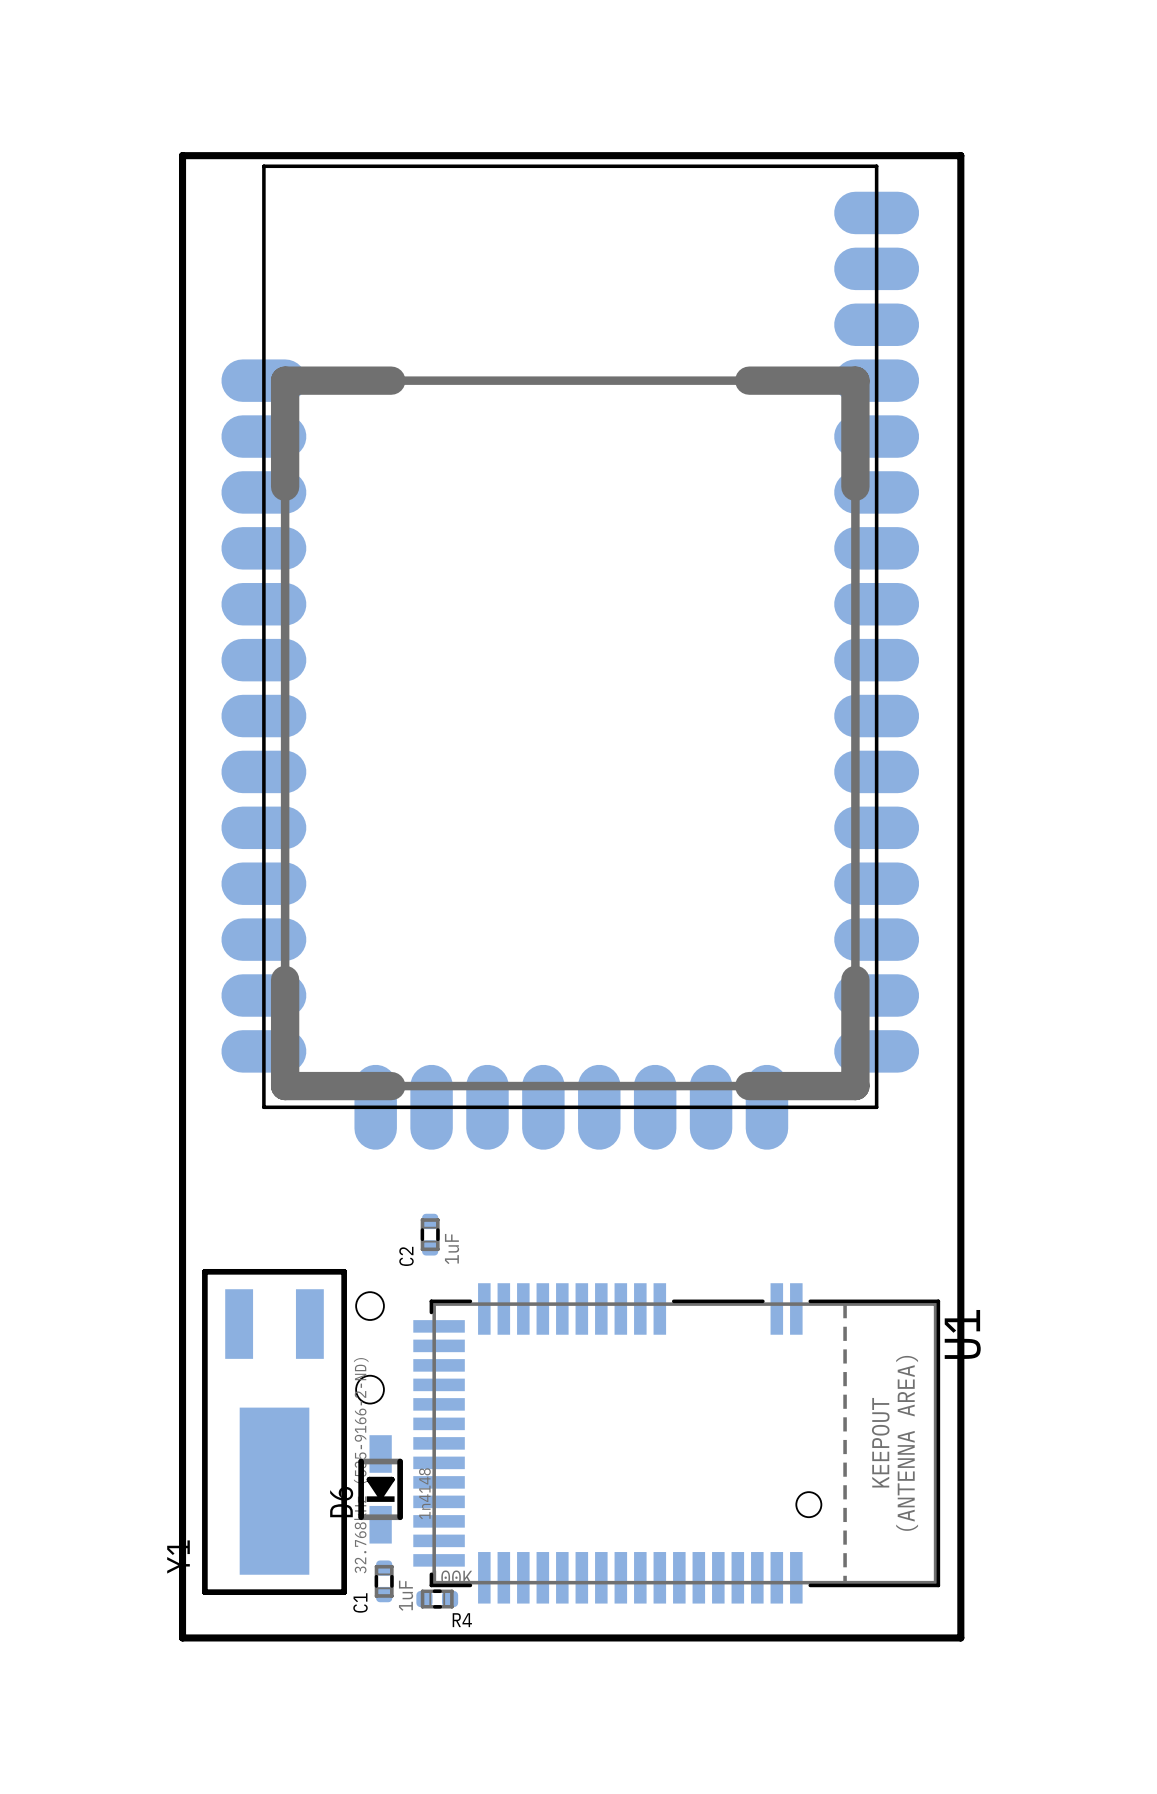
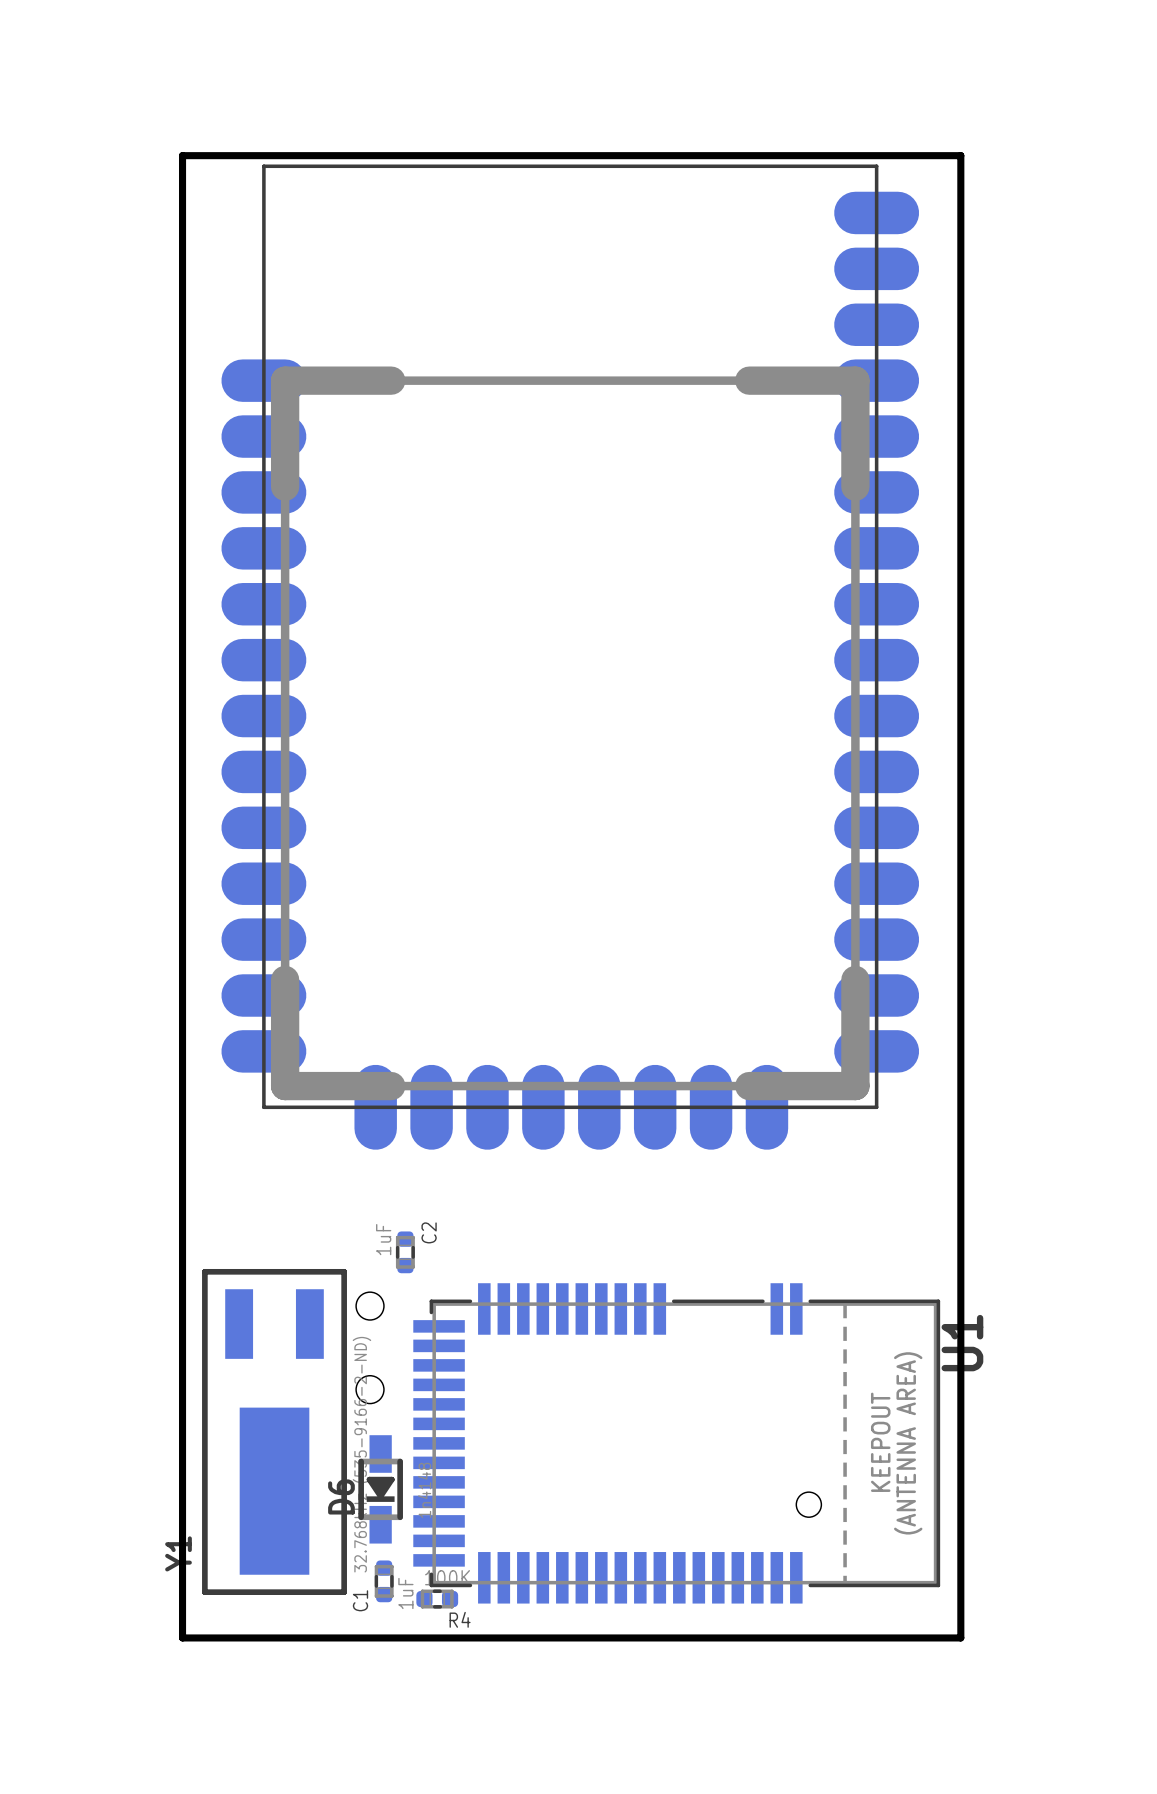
C2 position: (430, 1234) -> (405, 1252)
C2 value position: 1uF (452, 1249) -> 1uF (383, 1239)
C2 name position: C2 (406, 1256) -> C2 (429, 1232)

